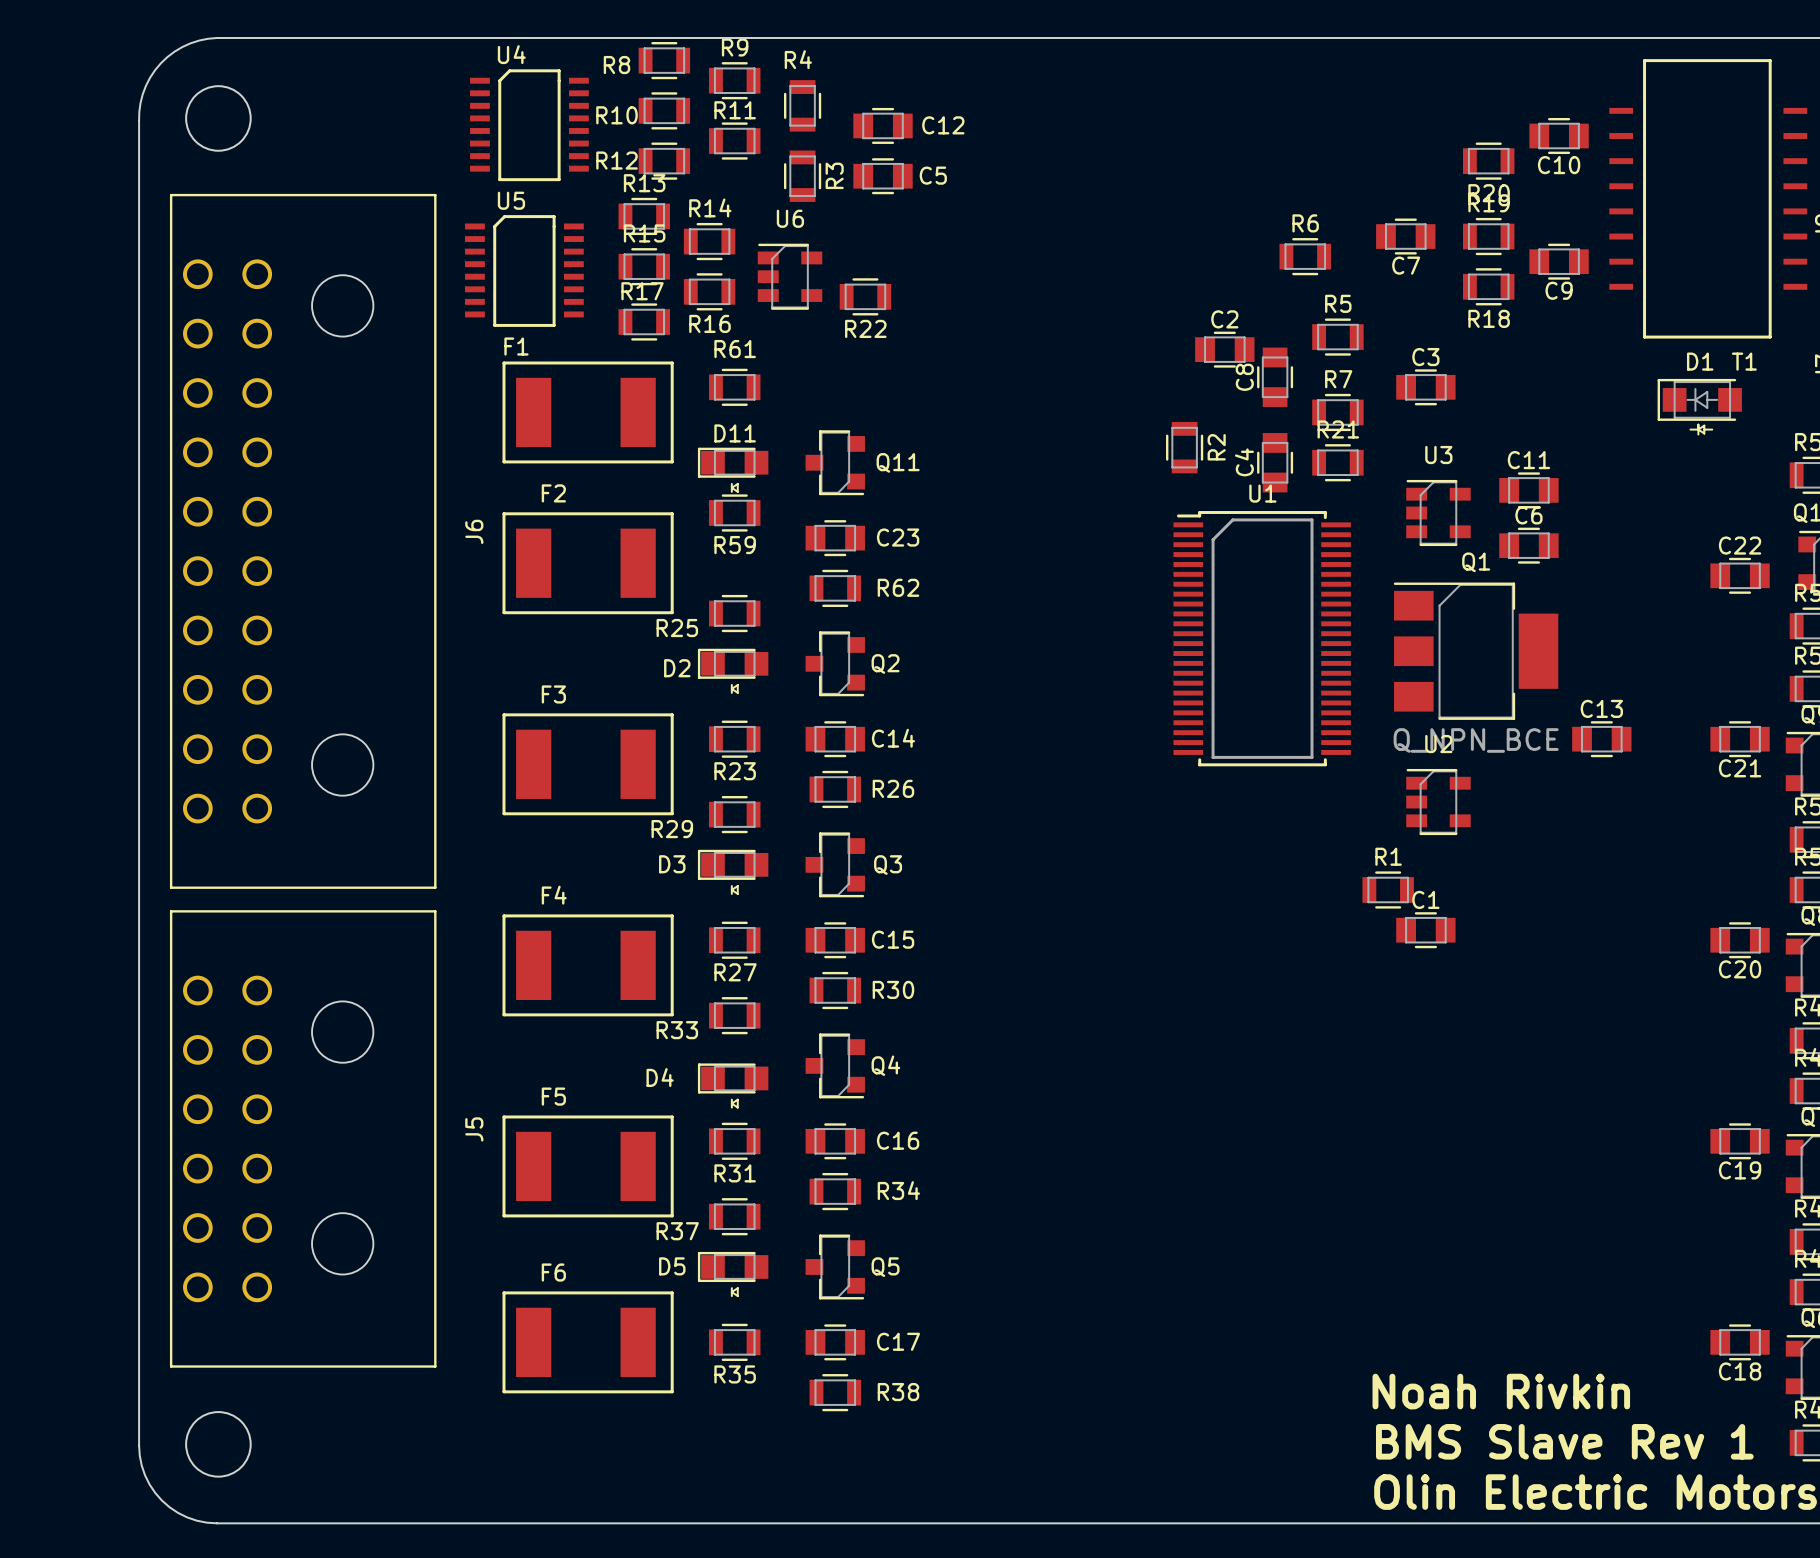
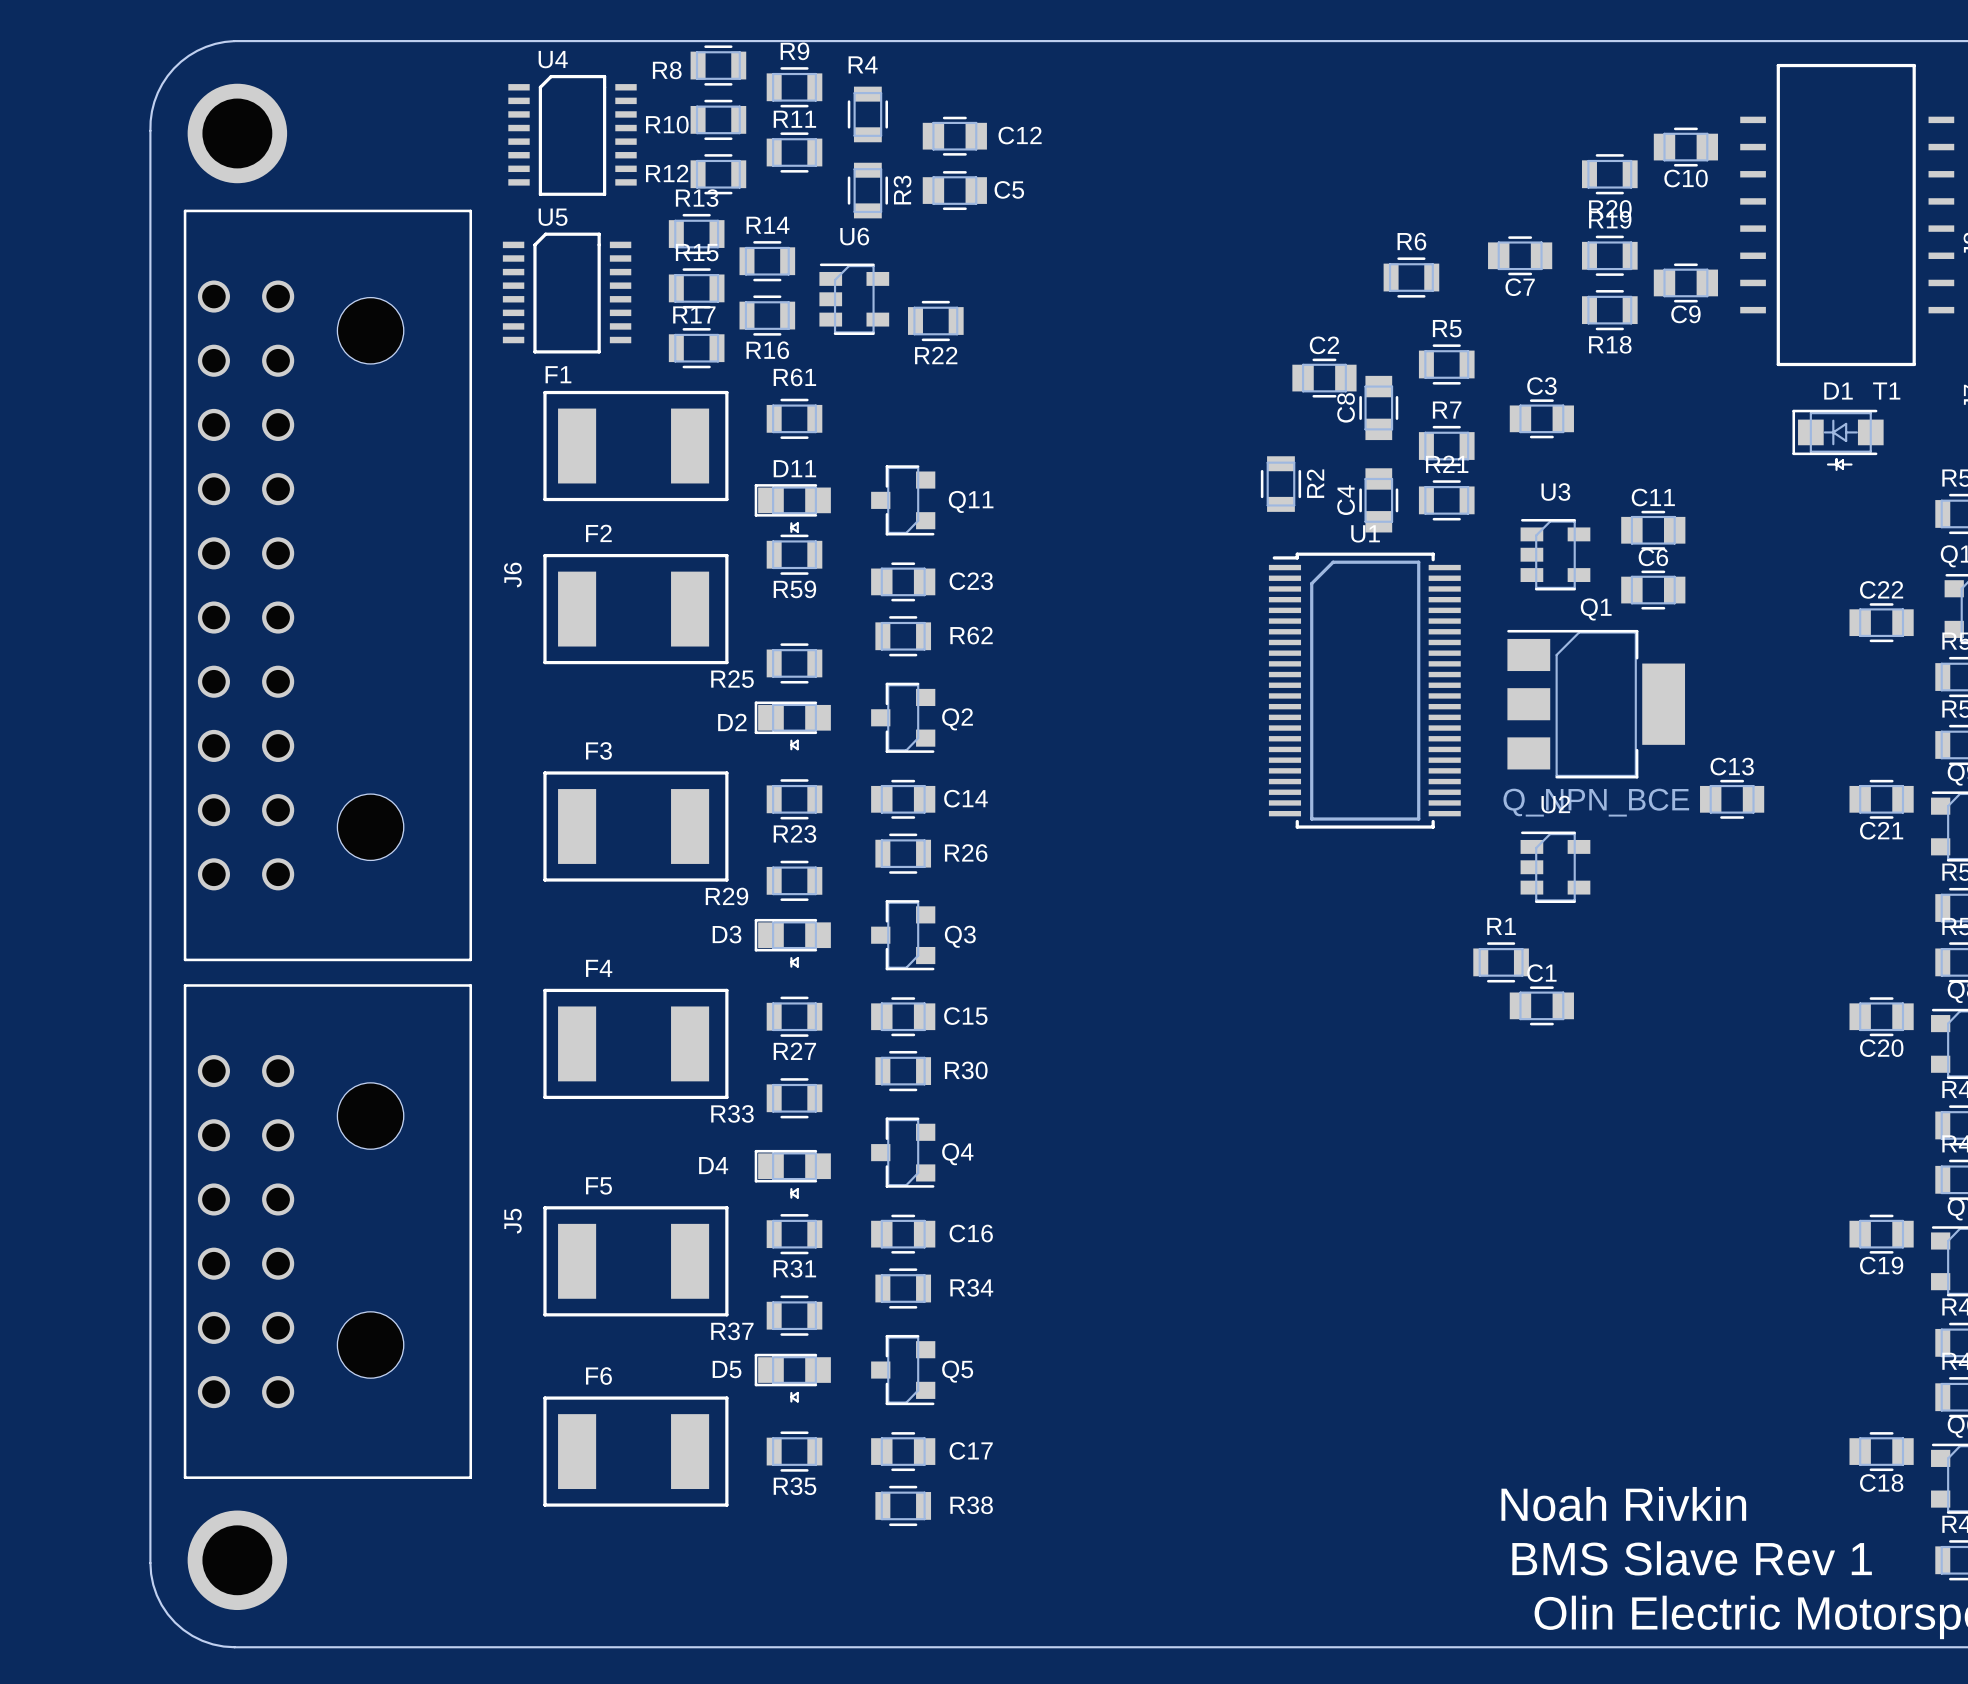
round board edge: [185, 85, 252, 152] -> none
part: none -> (237, 133)
round board edge: [185, 1411, 252, 1478] -> none
part: none -> (237, 1560)

